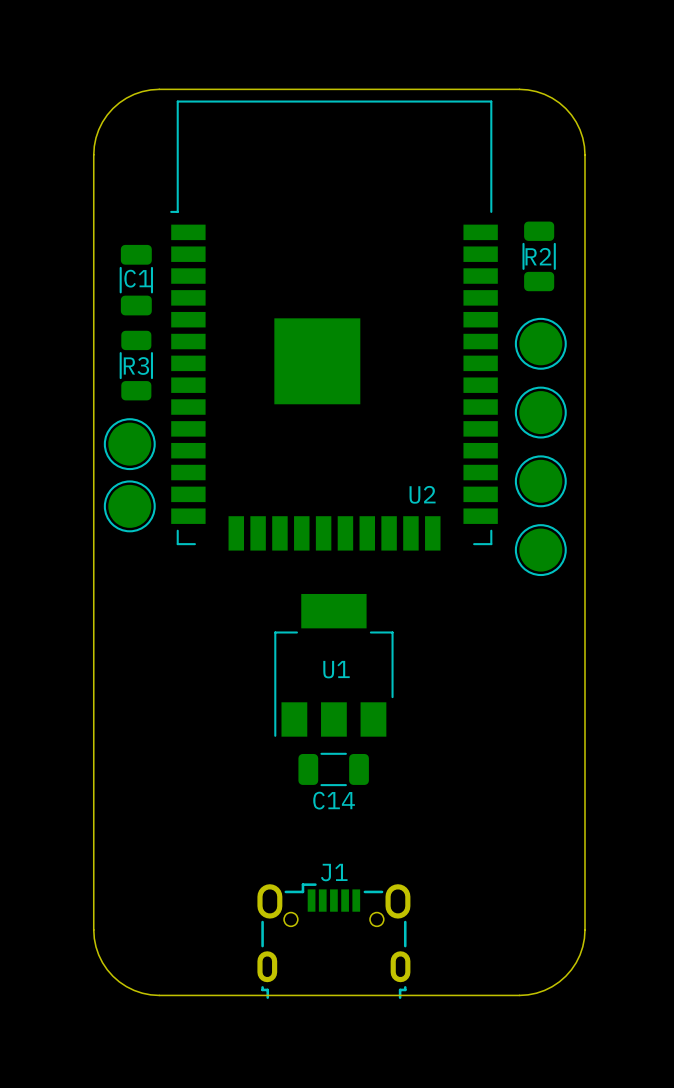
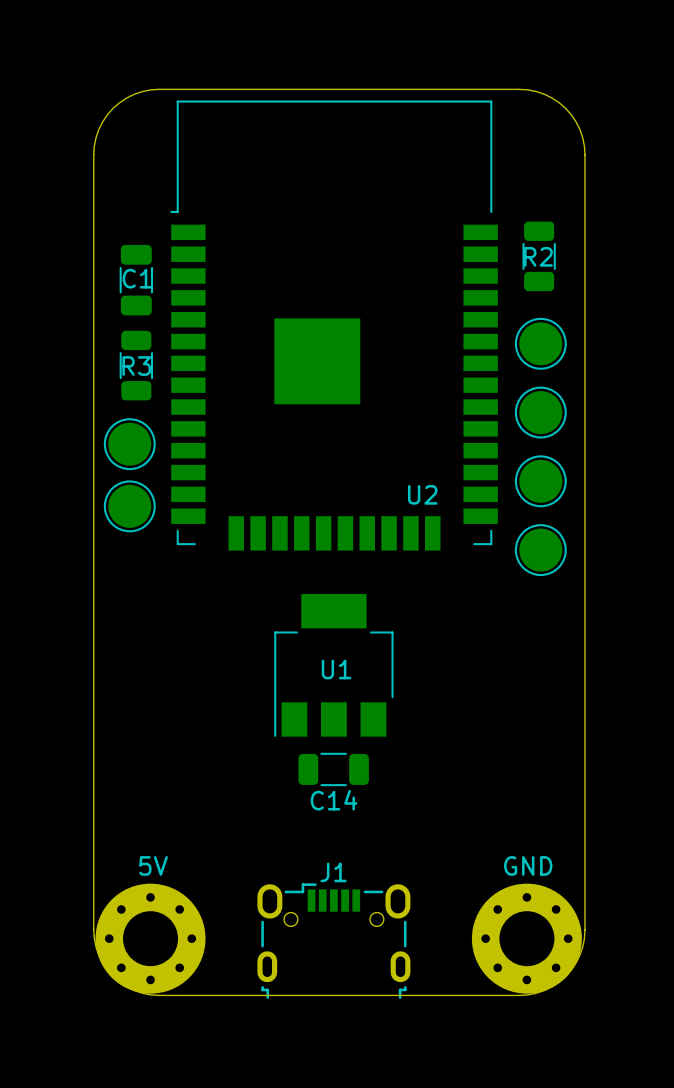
part: none -> 5V (150, 938)
part: none -> GND (526, 938)

